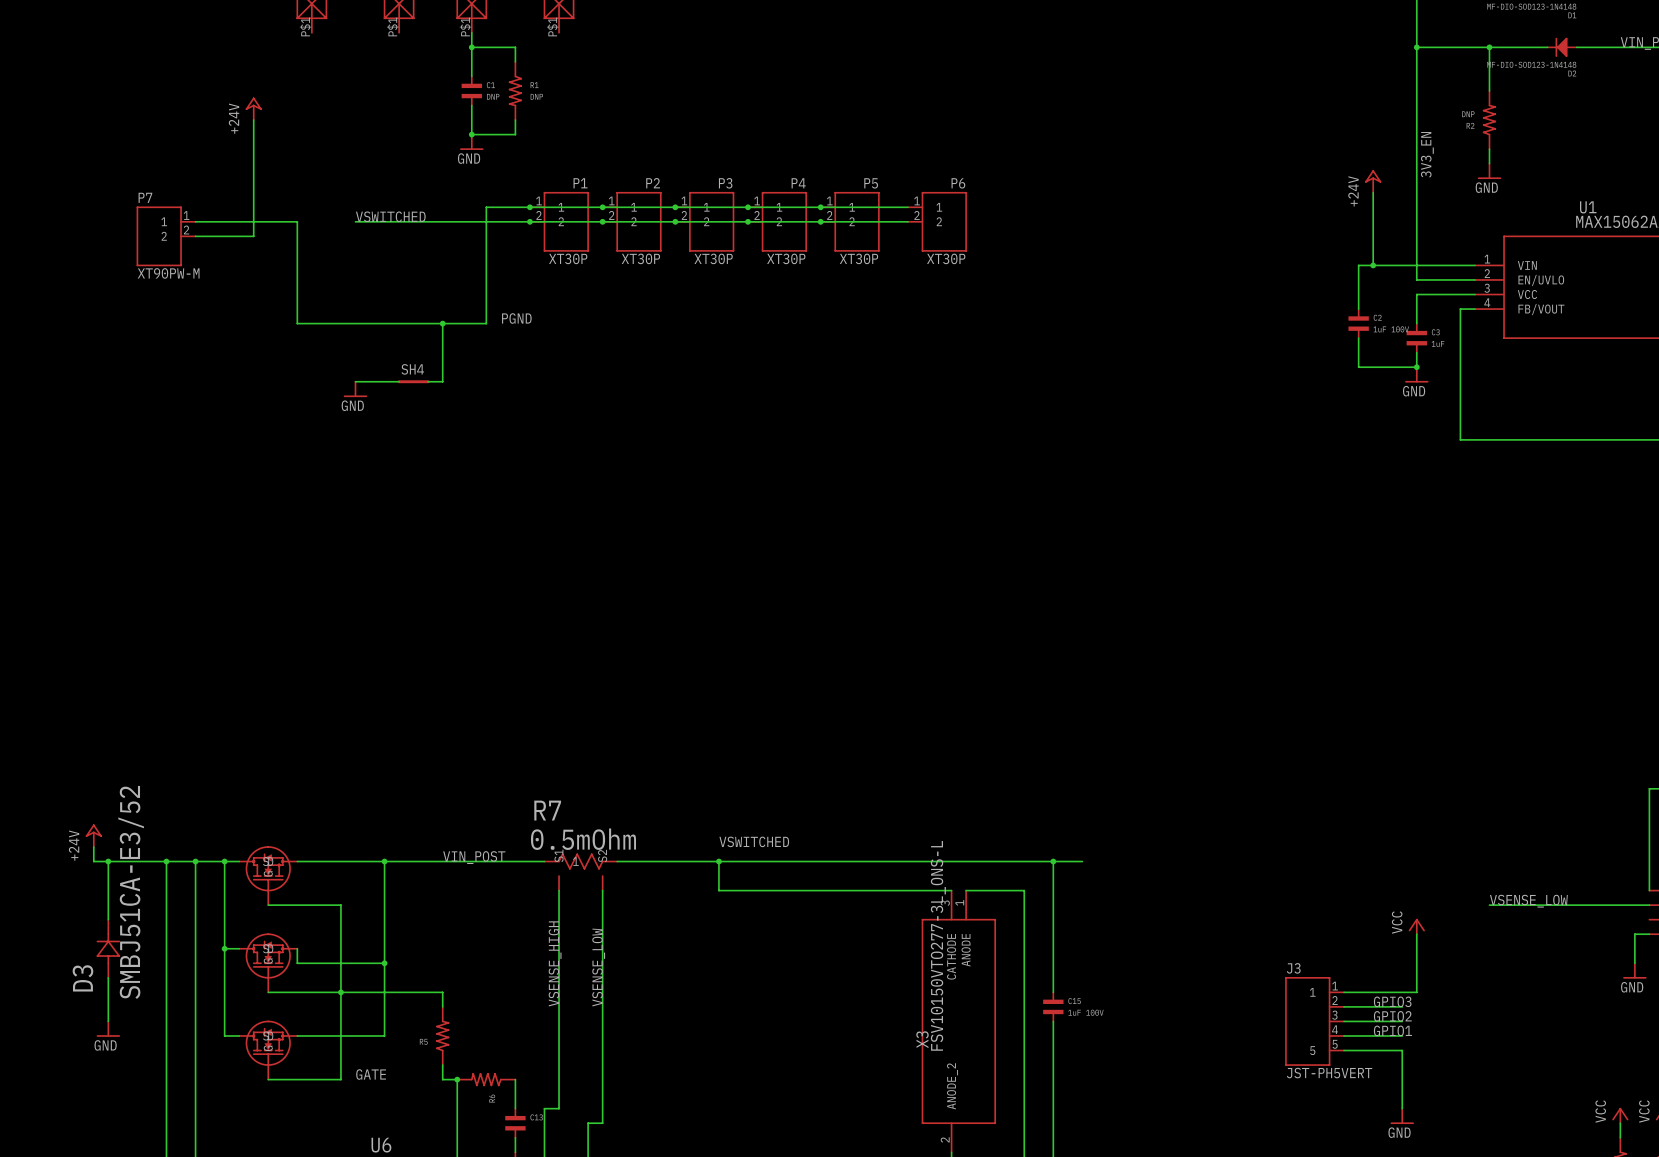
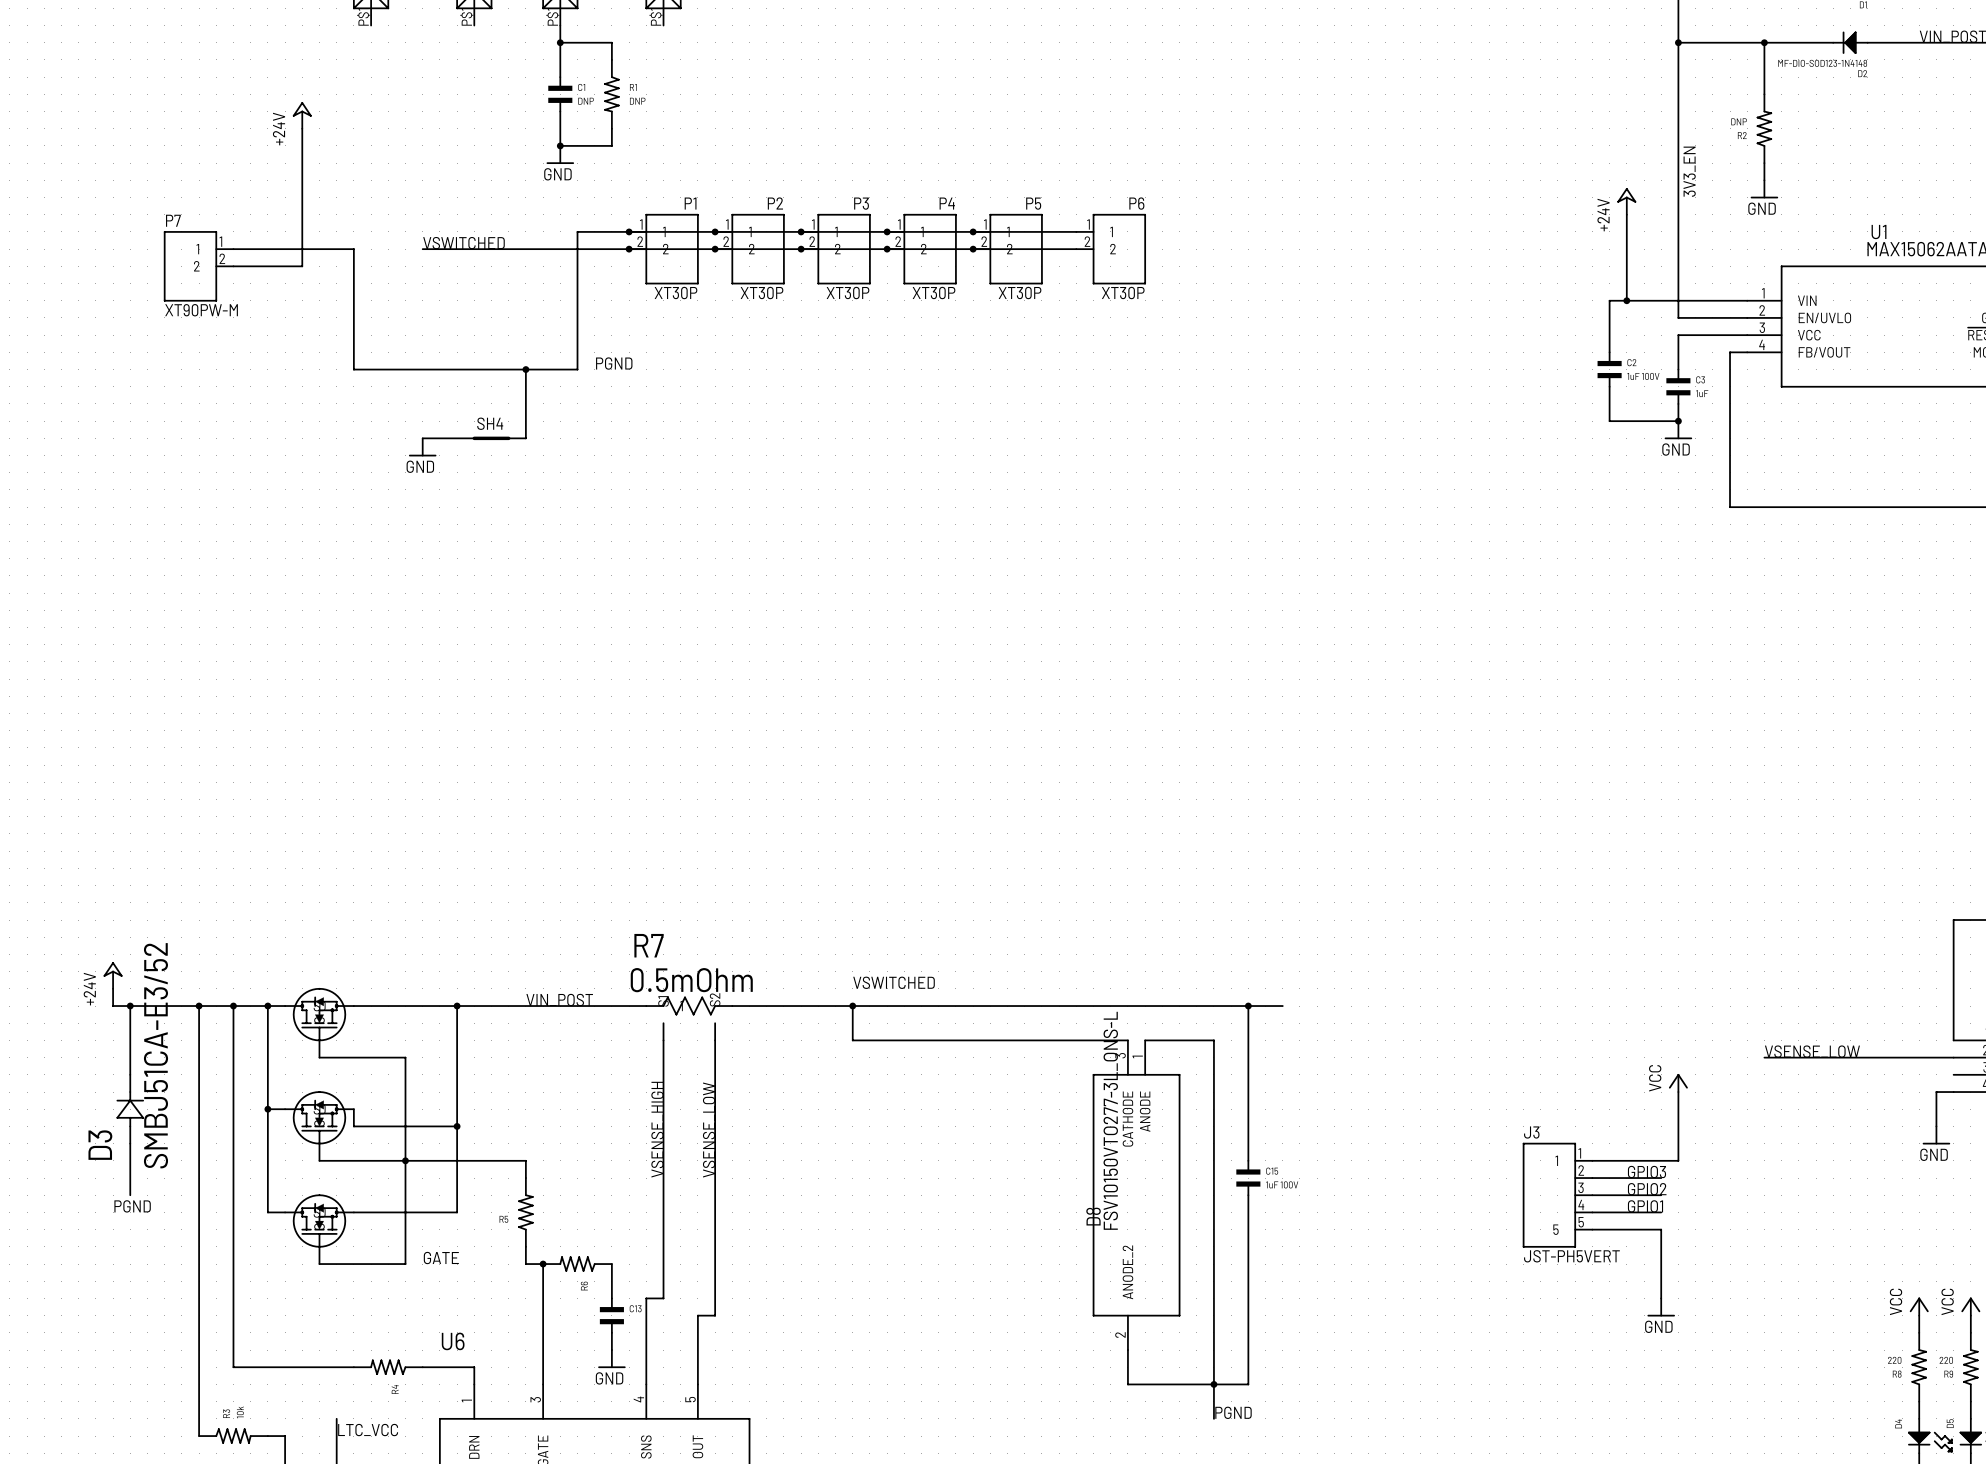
power symbol: GND (108, 1029) -> none
label: none -> PGND (132, 1206)
X3 name: X3 (922, 1039) -> D8 (1093, 1216)

